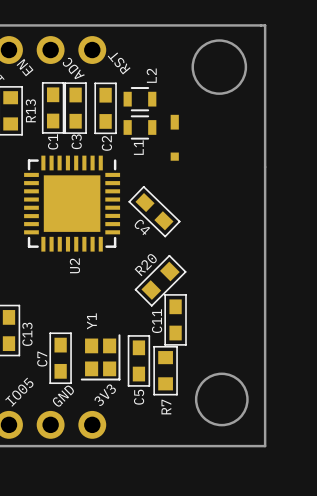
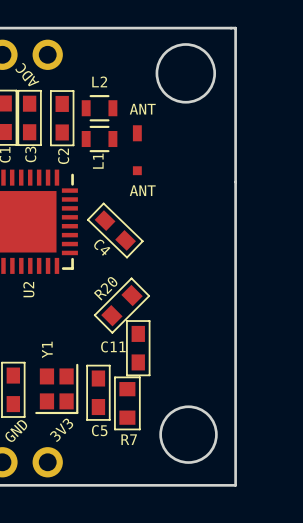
text: RST (119, 63) -> none
L2 name rotation: 0° (151, 75) -> 90° clockwise (99, 81)
ANT value: none -> ANT (142, 109)
ANT name: none -> ANT (142, 190)
C11 name rotation: 0° (157, 321) -> 90° clockwise (113, 346)
C5 name rotation: 0° (139, 397) -> 90° clockwise (99, 430)
R7 name rotation: 0° (166, 407) -> 90° clockwise (129, 439)

